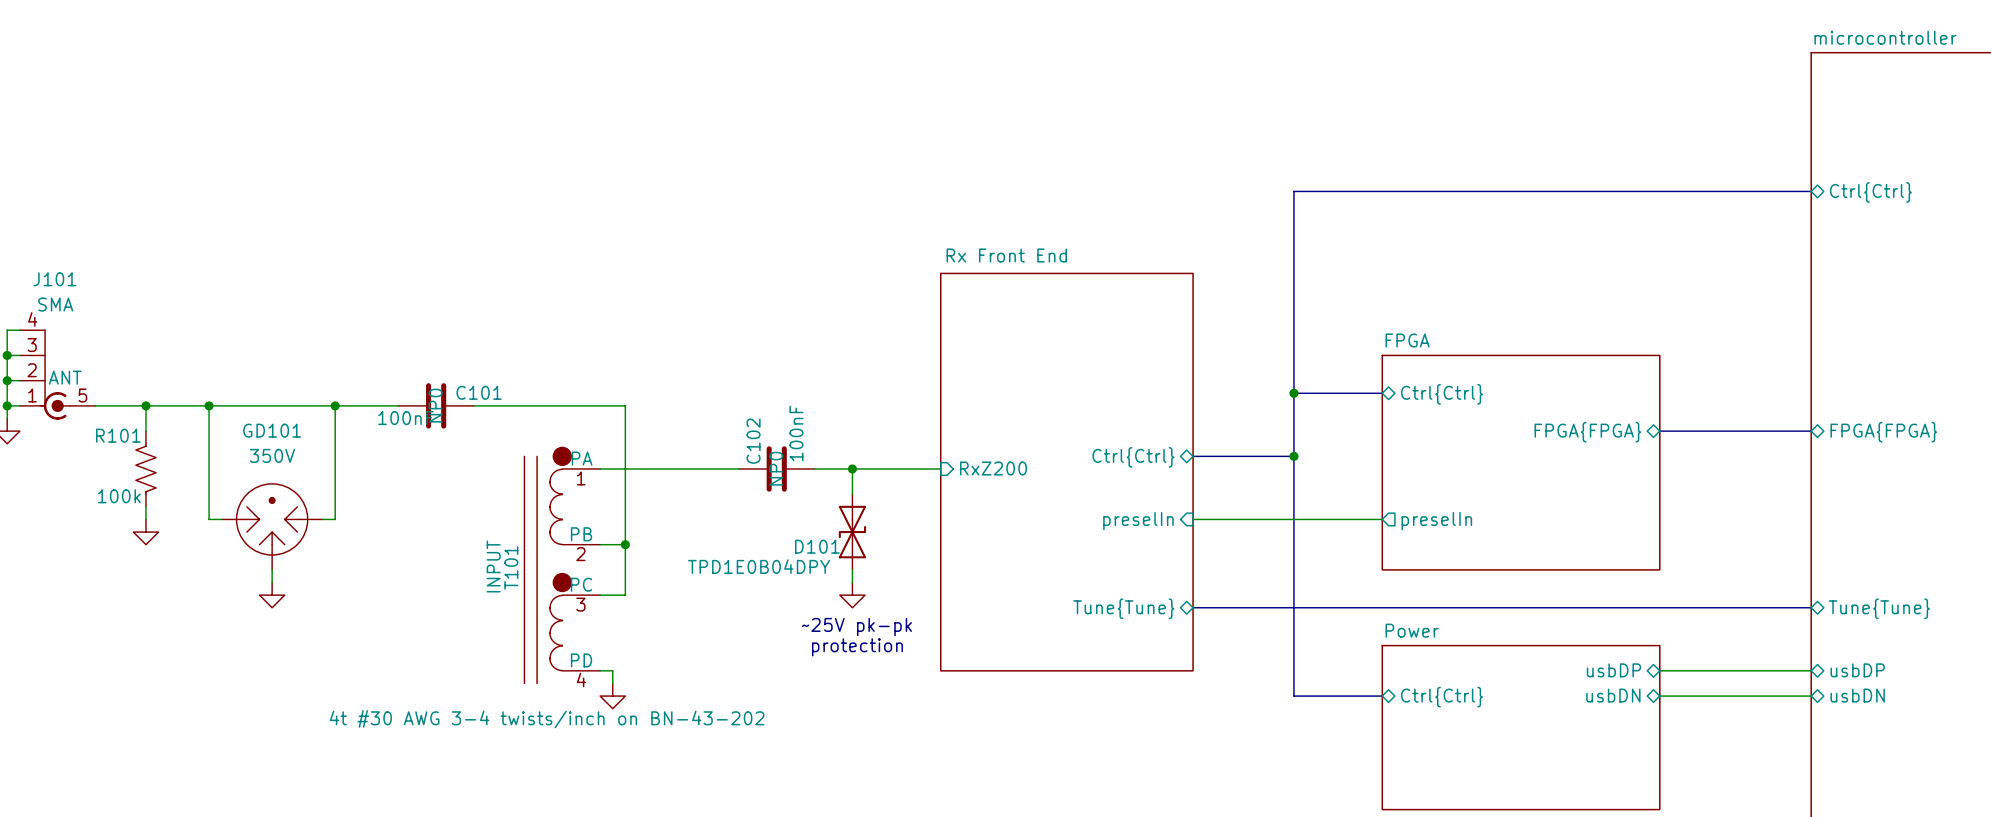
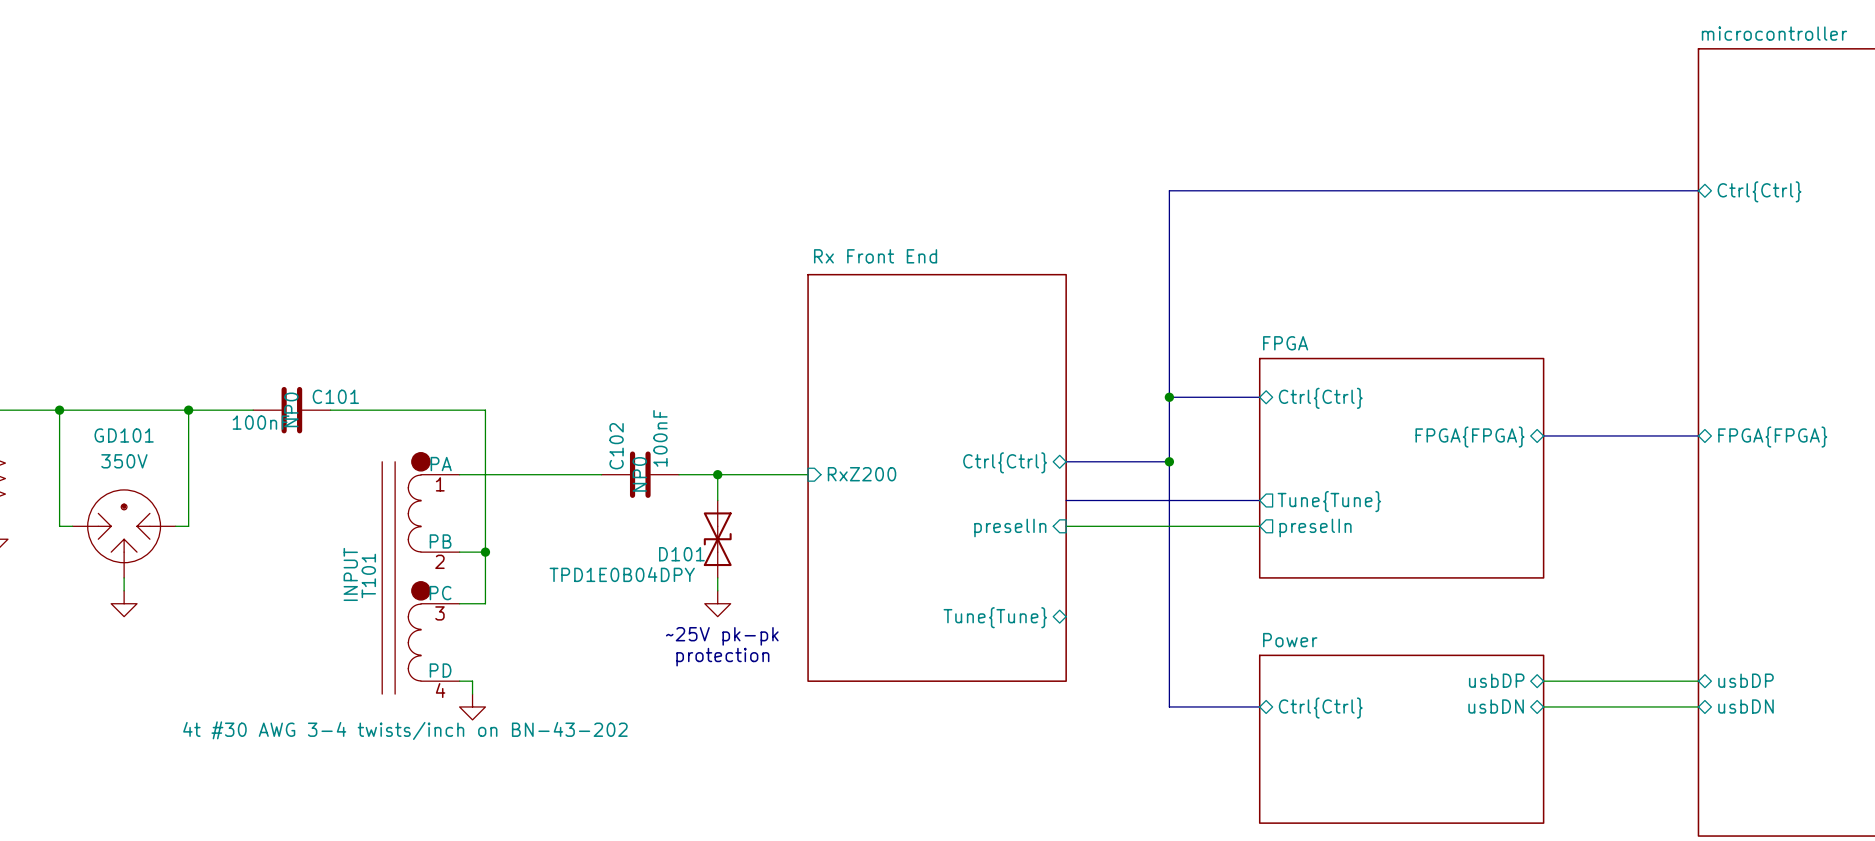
bus: none -> (1066, 500) (1259, 500)
sheet pin: none -> Tune{Tune} (1329, 501)
bus: (1193, 607) (1811, 607) -> none
sheet pin: Tune{Tune} (1879, 608) -> none

